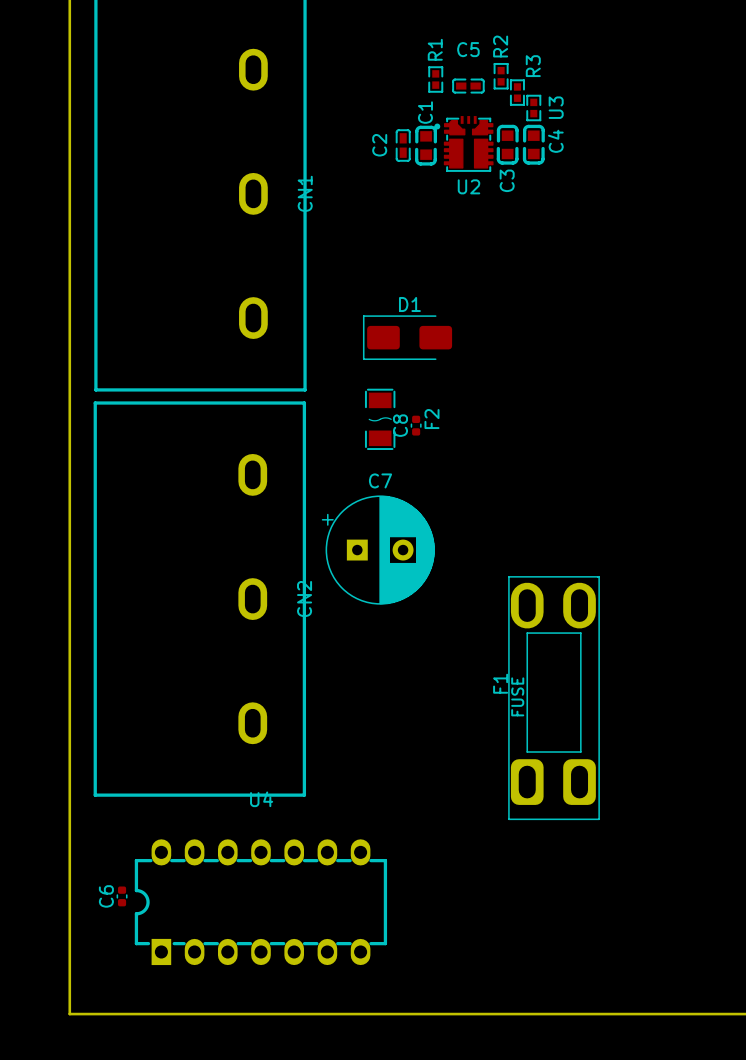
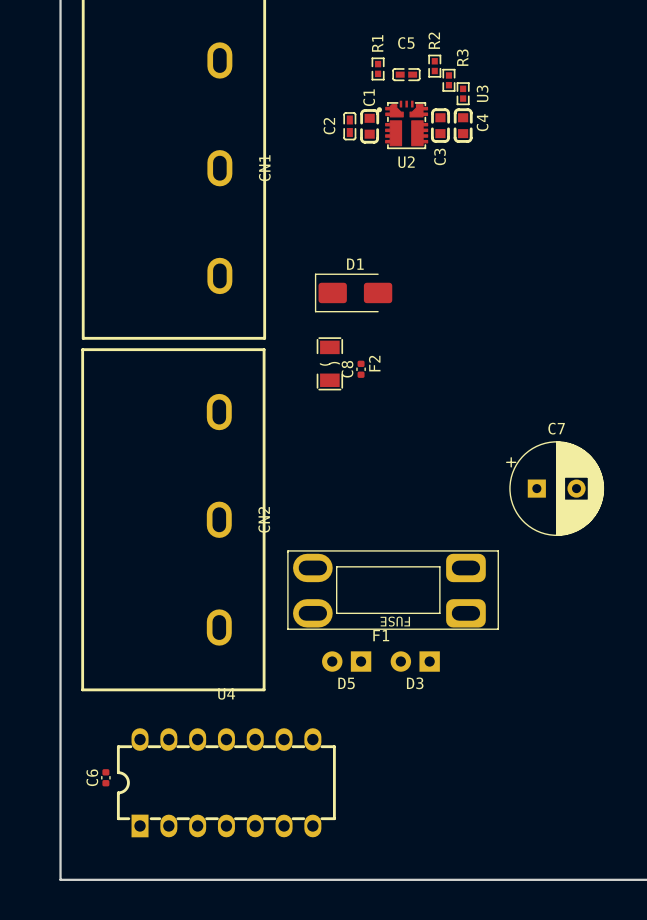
C7 position: (378, 550) -> (555, 488)
F1 rotation: 0° (554, 698) -> 90° counterclockwise (393, 590)
D5: none -> (346, 660)
D3: none -> (415, 660)

